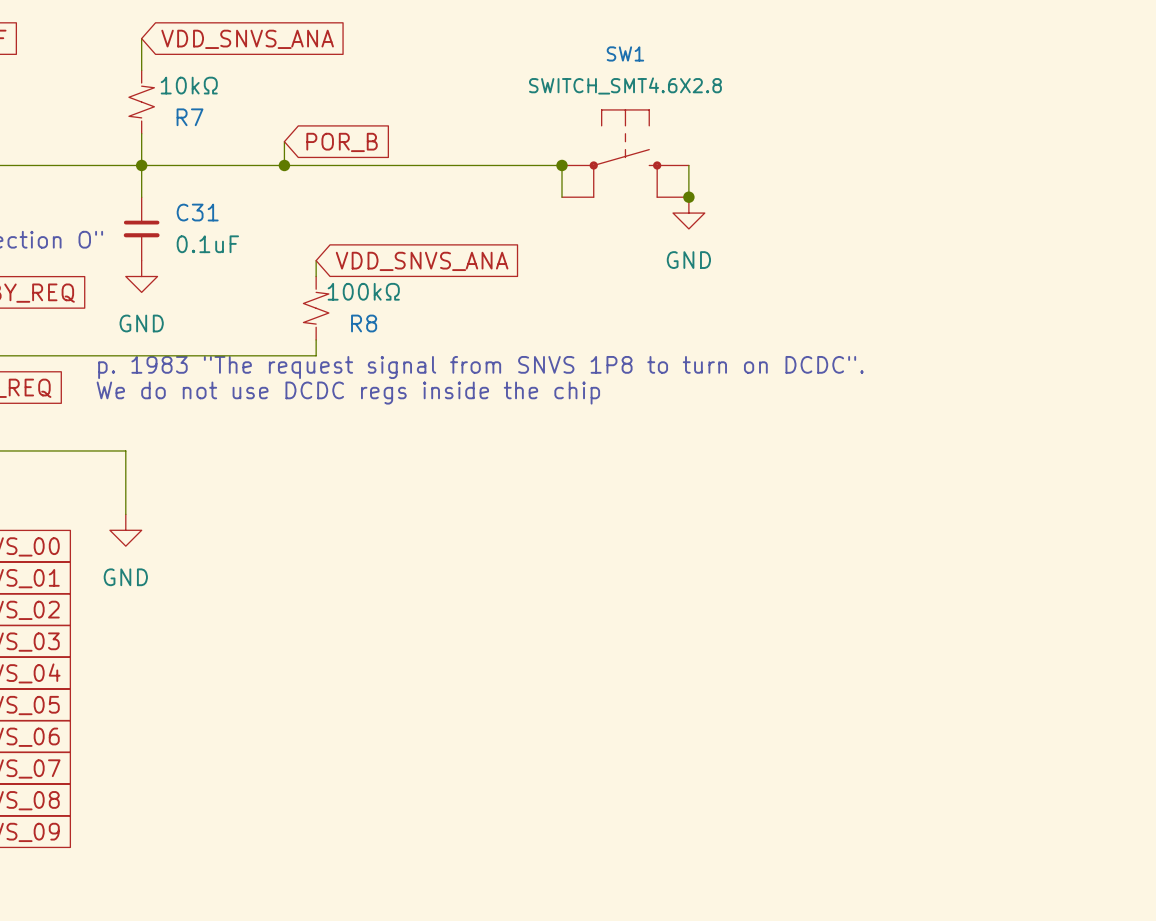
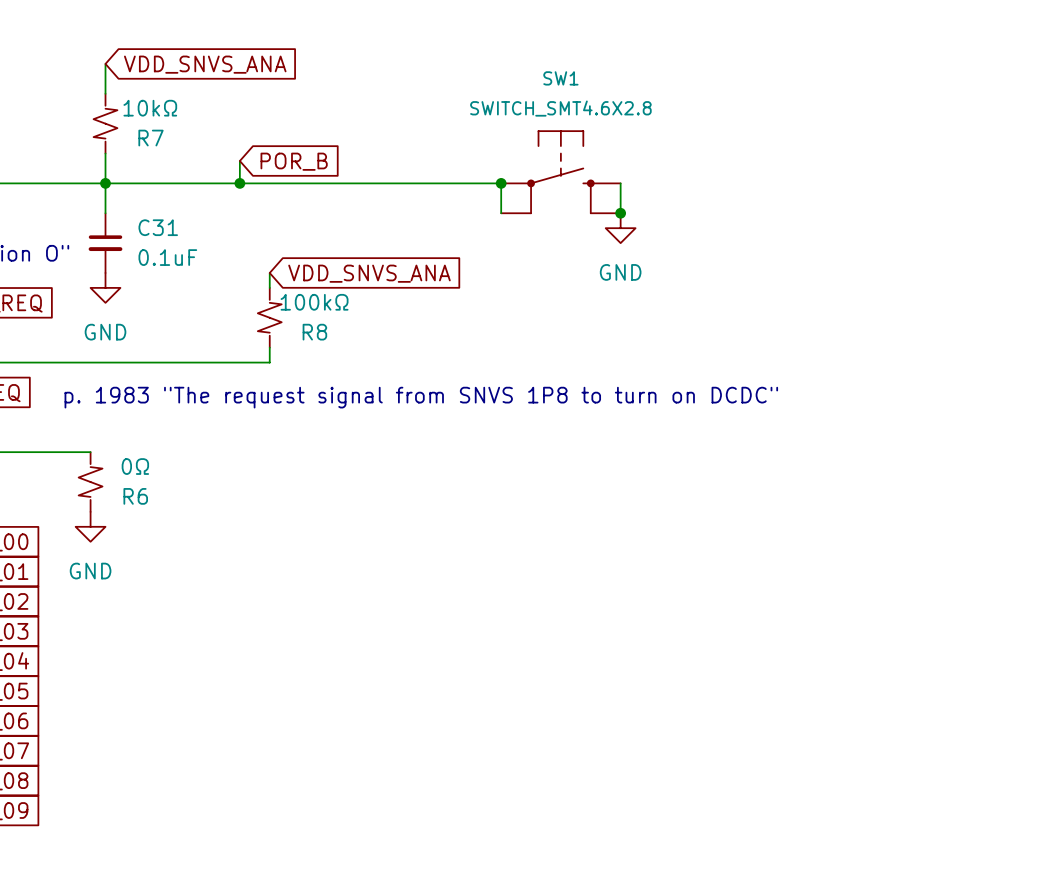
text: p. 1983 "The request signal from SNVS 1P8 to turn on DCDC". (480, 367) -> none
text: We do not use DCDC regs inside the chip (348, 393) -> p. 1983 "The request signal from SNVS 1P8 to turn on DCDC" (421, 397)
R6: none -> 0Ω (90, 482)

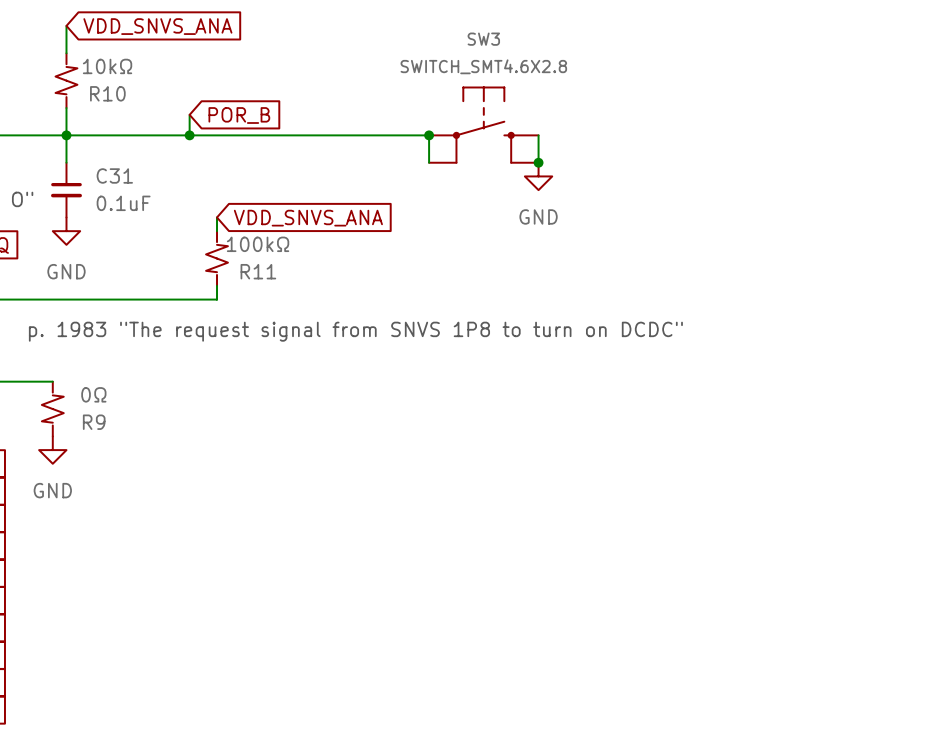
SW1 name: SW1 (560, 78) -> SW3 (483, 39)
R7 name: R7 (151, 138) -> R10 (107, 93)
R8 name: R8 (314, 332) -> R11 (258, 271)
R6 name: R6 (135, 496) -> R9 (94, 422)

